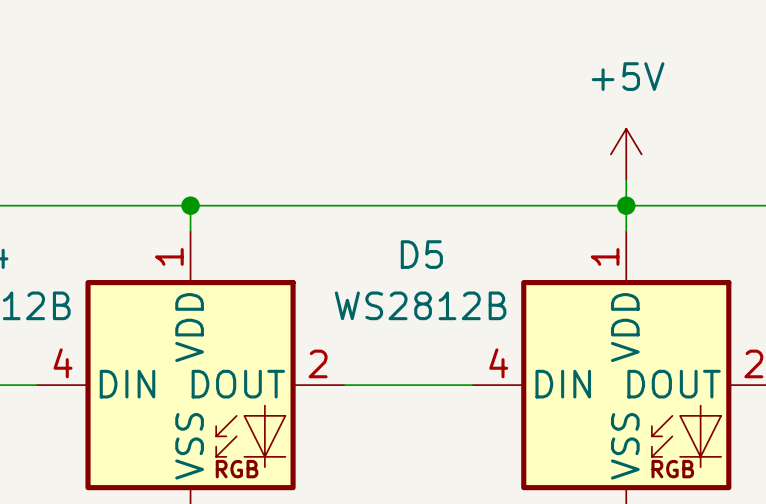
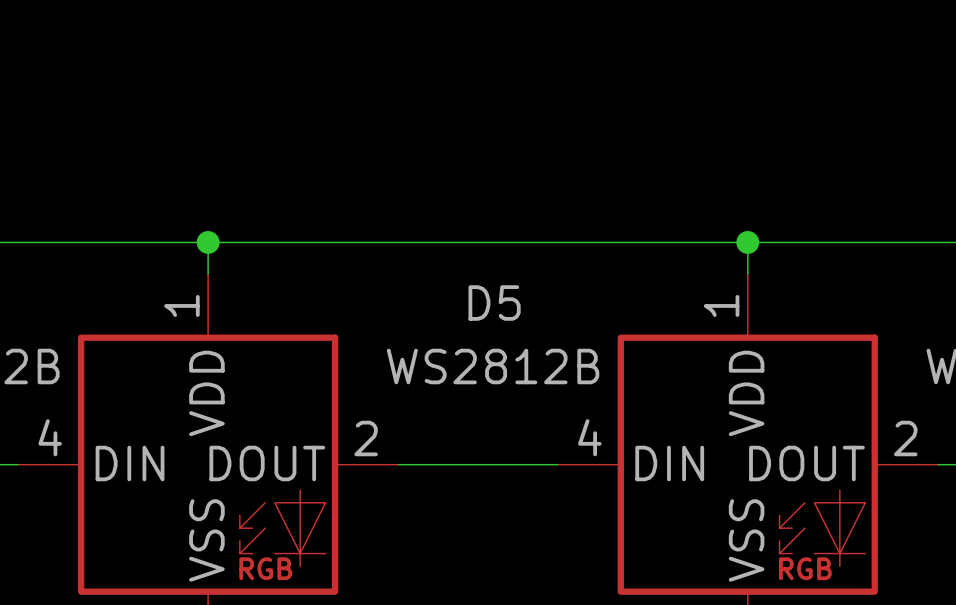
power symbol: +5V (626, 154) -> none
wire: (626, 180) (626, 205) -> none

